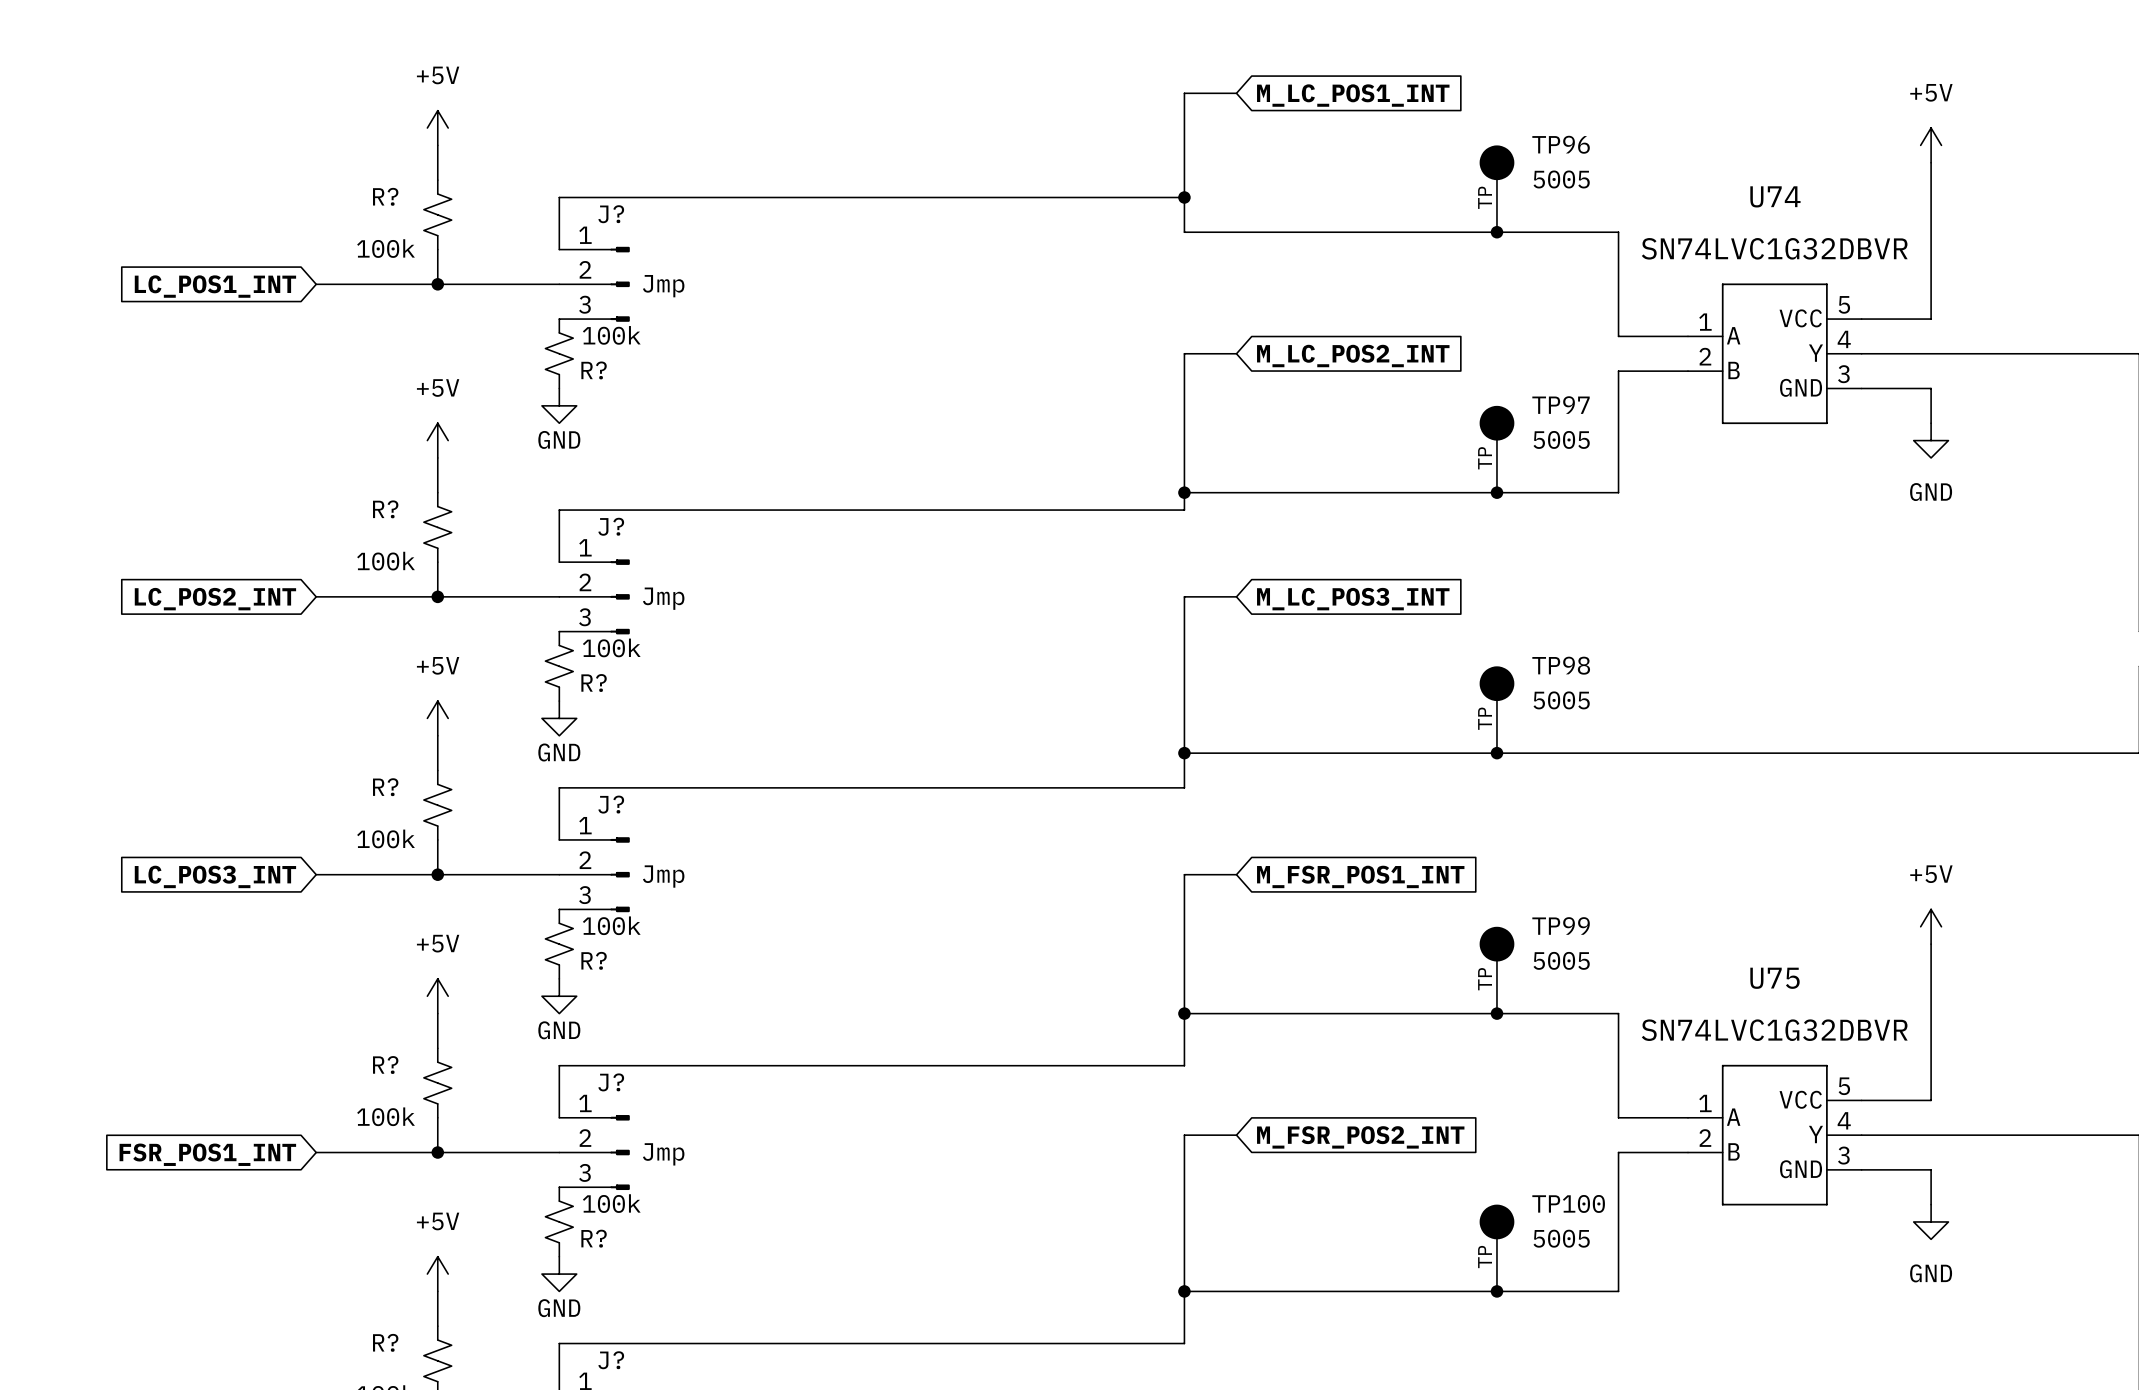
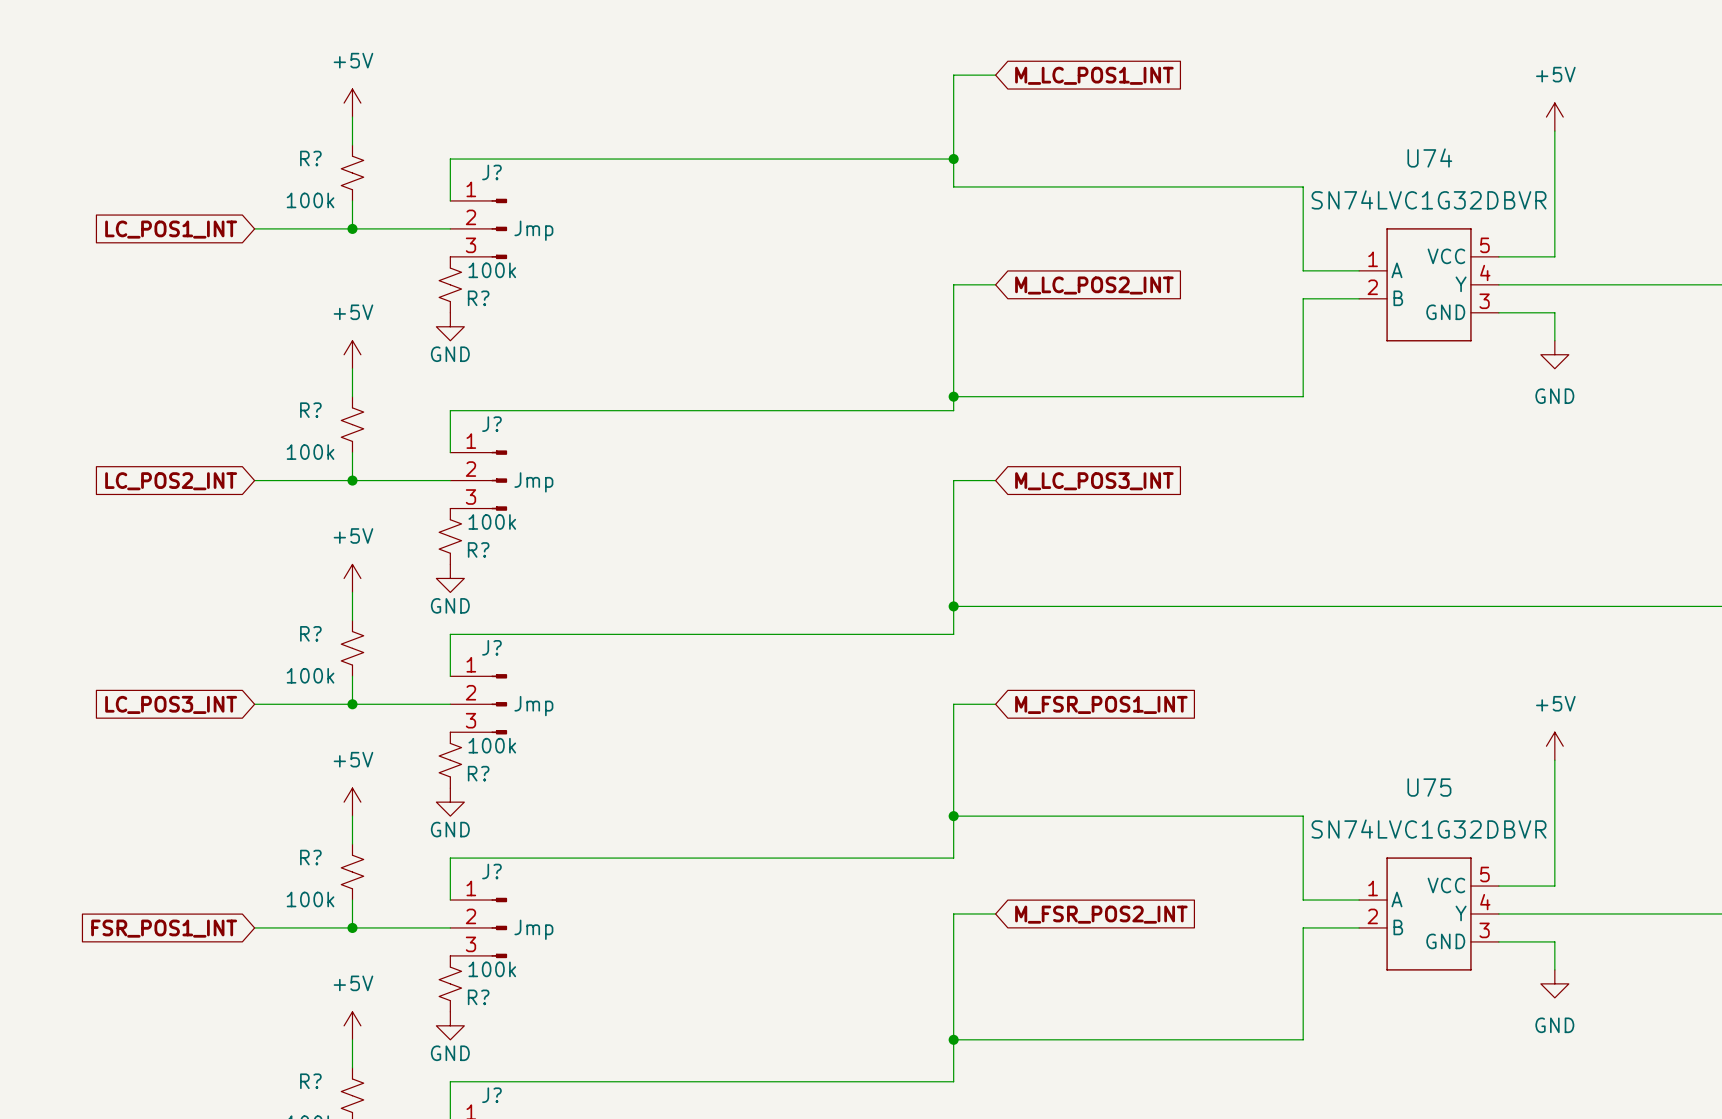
TP96: 5005 (1496, 188) -> none
junction: (1496, 232) -> none
TP97: 5005 (1496, 449) -> none
junction: (1496, 492) -> none
TP98: 5005 (1496, 709) -> none
junction: (1496, 753) -> none
TP99: 5005 (1496, 970) -> none
junction: (1496, 1013) -> none
TP100: 5005 (1496, 1248) -> none
junction: (1496, 1291) -> none

